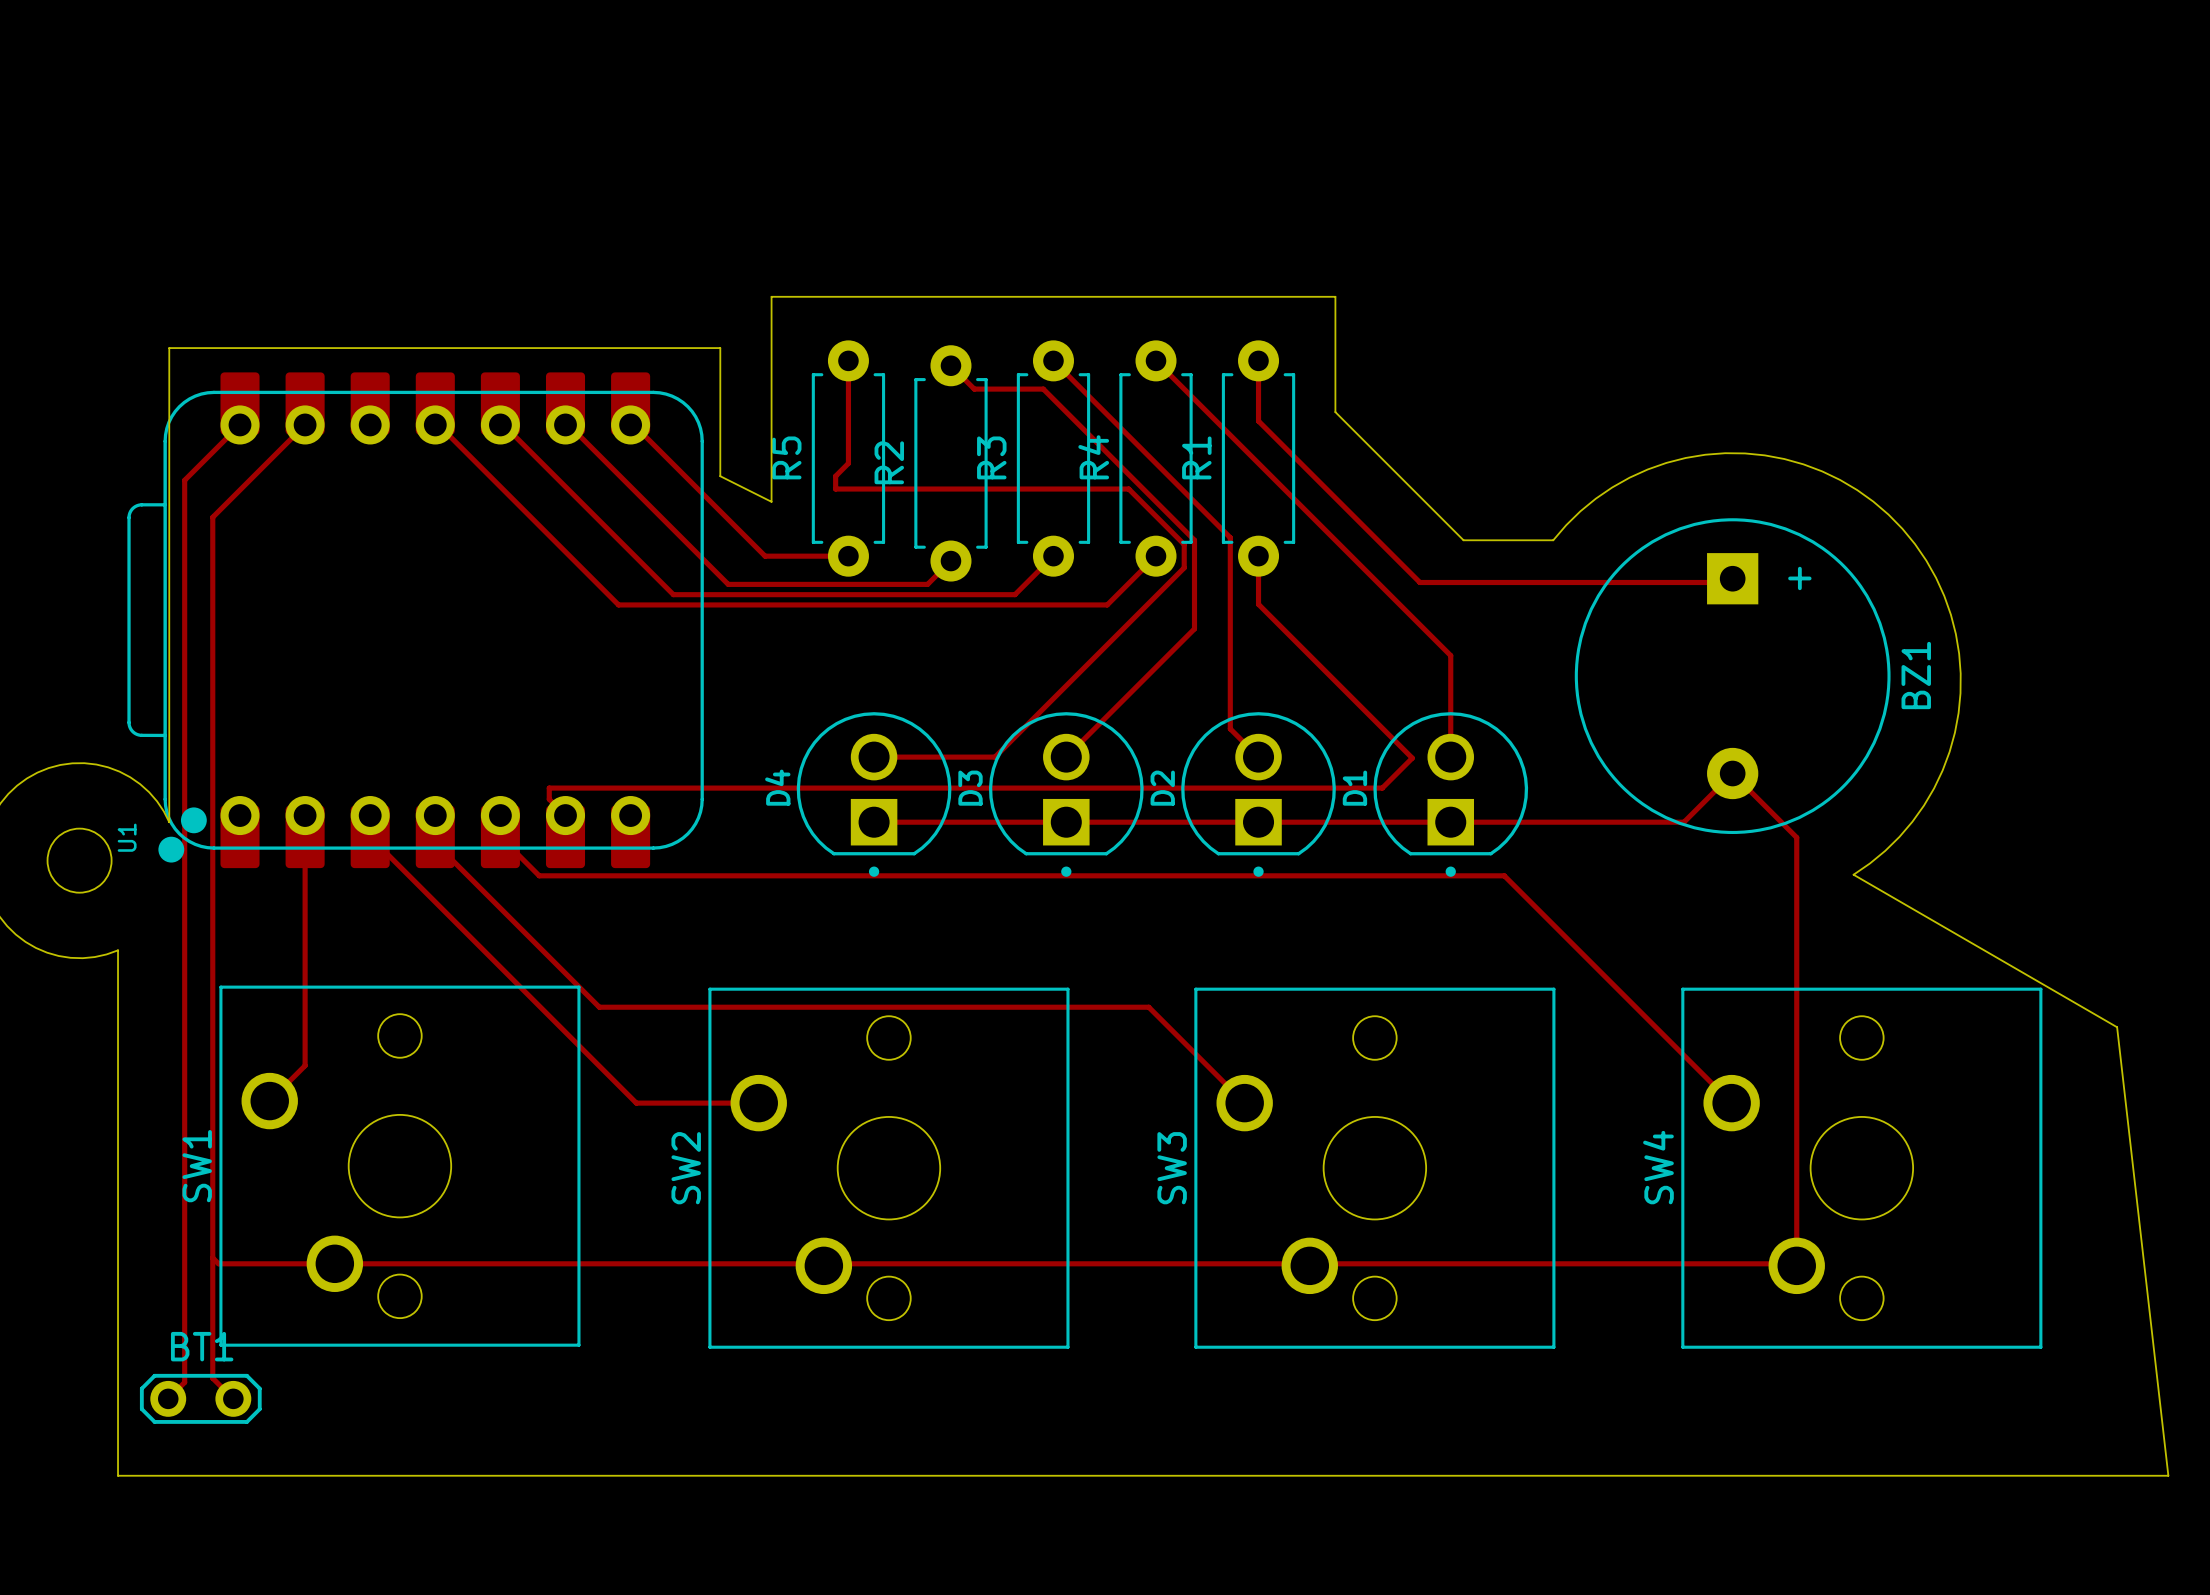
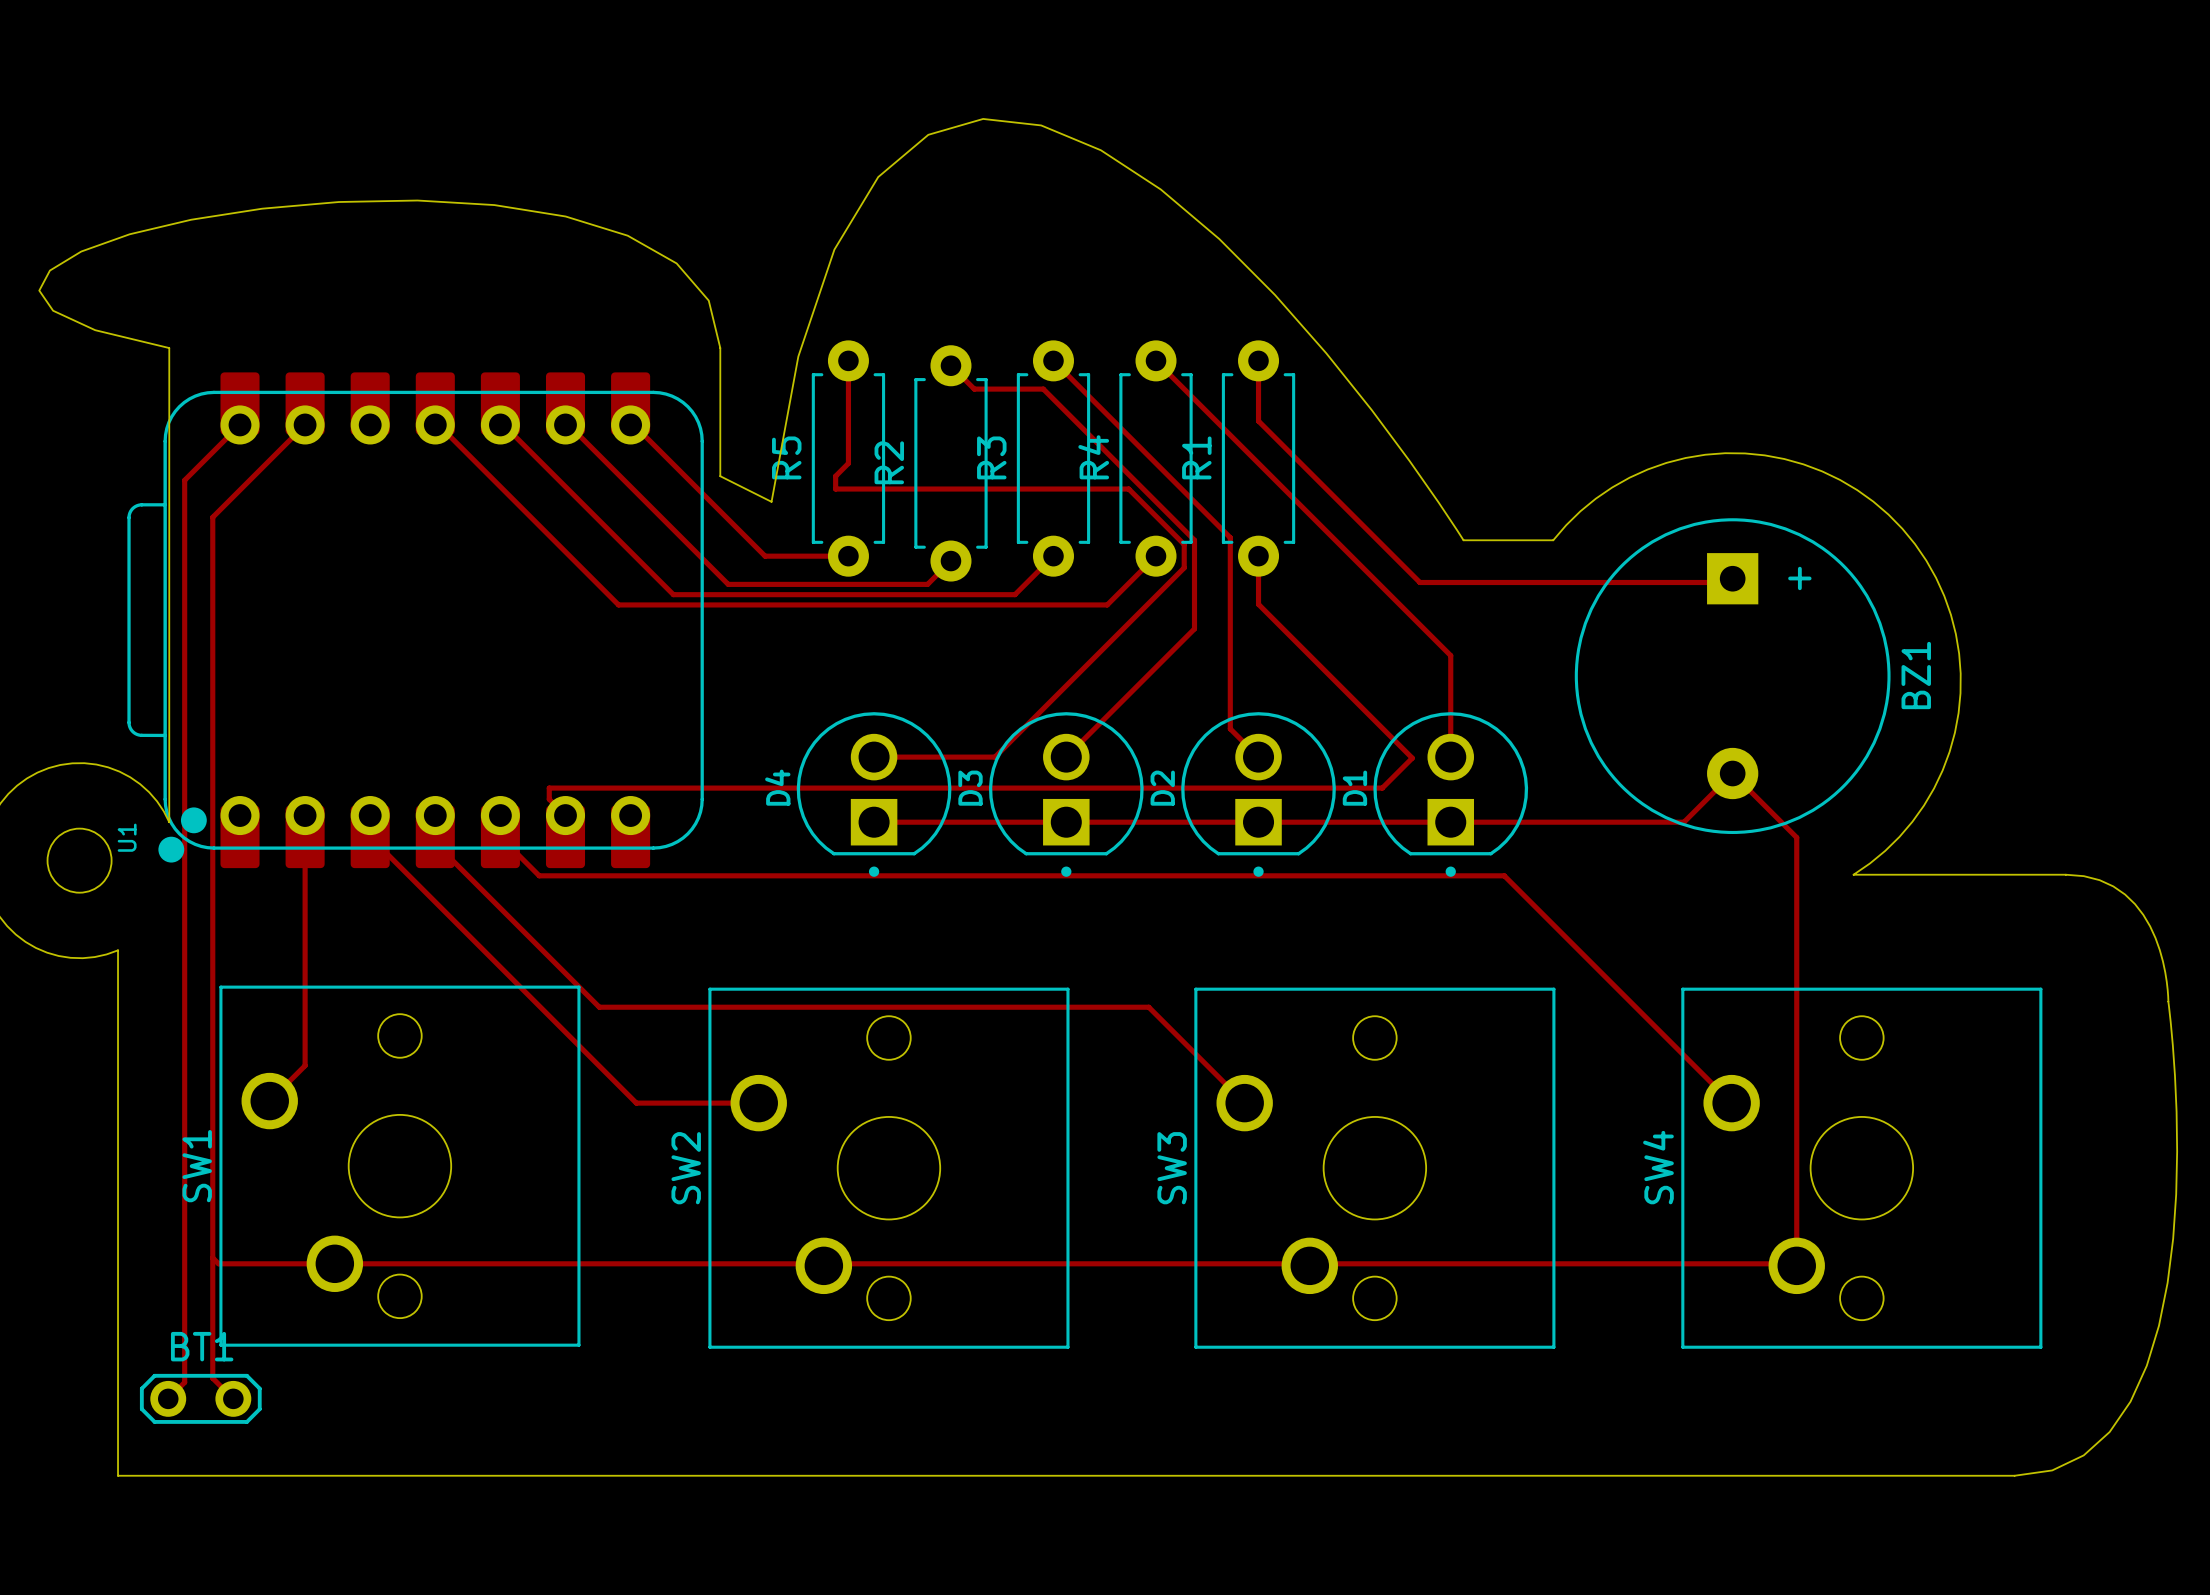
board edge: (169, 348) (720, 348) -> (169, 348) (95, 330) (53, 310) (39, 290) (49, 270) (81, 251) (129, 234) (191, 219) (262, 208) (338, 202) (417, 200) (494, 205) (565, 216) (627, 235) (676, 263) (708, 300) (720, 348)
board edge: (771, 501) (771, 296) (1335, 296) (1335, 412) (1463, 540) -> (771, 501) (798, 356) (834, 249) (878, 177) (928, 134) (983, 118) (1041, 125) (1100, 150) (1160, 189) (1219, 239) (1275, 294) (1326, 353) (1409, 460) (1463, 540)
board edge: (1853, 874) (2117, 1027) (2168, 1475) (2014, 1475) -> (1853, 874) (2065, 874) (2099, 880) (2113, 886) (2135, 904) (2150, 926) (2162, 961) (2172, 1045) (2177, 1151) (2173, 1238) (2167, 1282) (2158, 1325) (2146, 1365) (2130, 1401) (2109, 1432) (2083, 1455) (2052, 1470) (2014, 1475)

